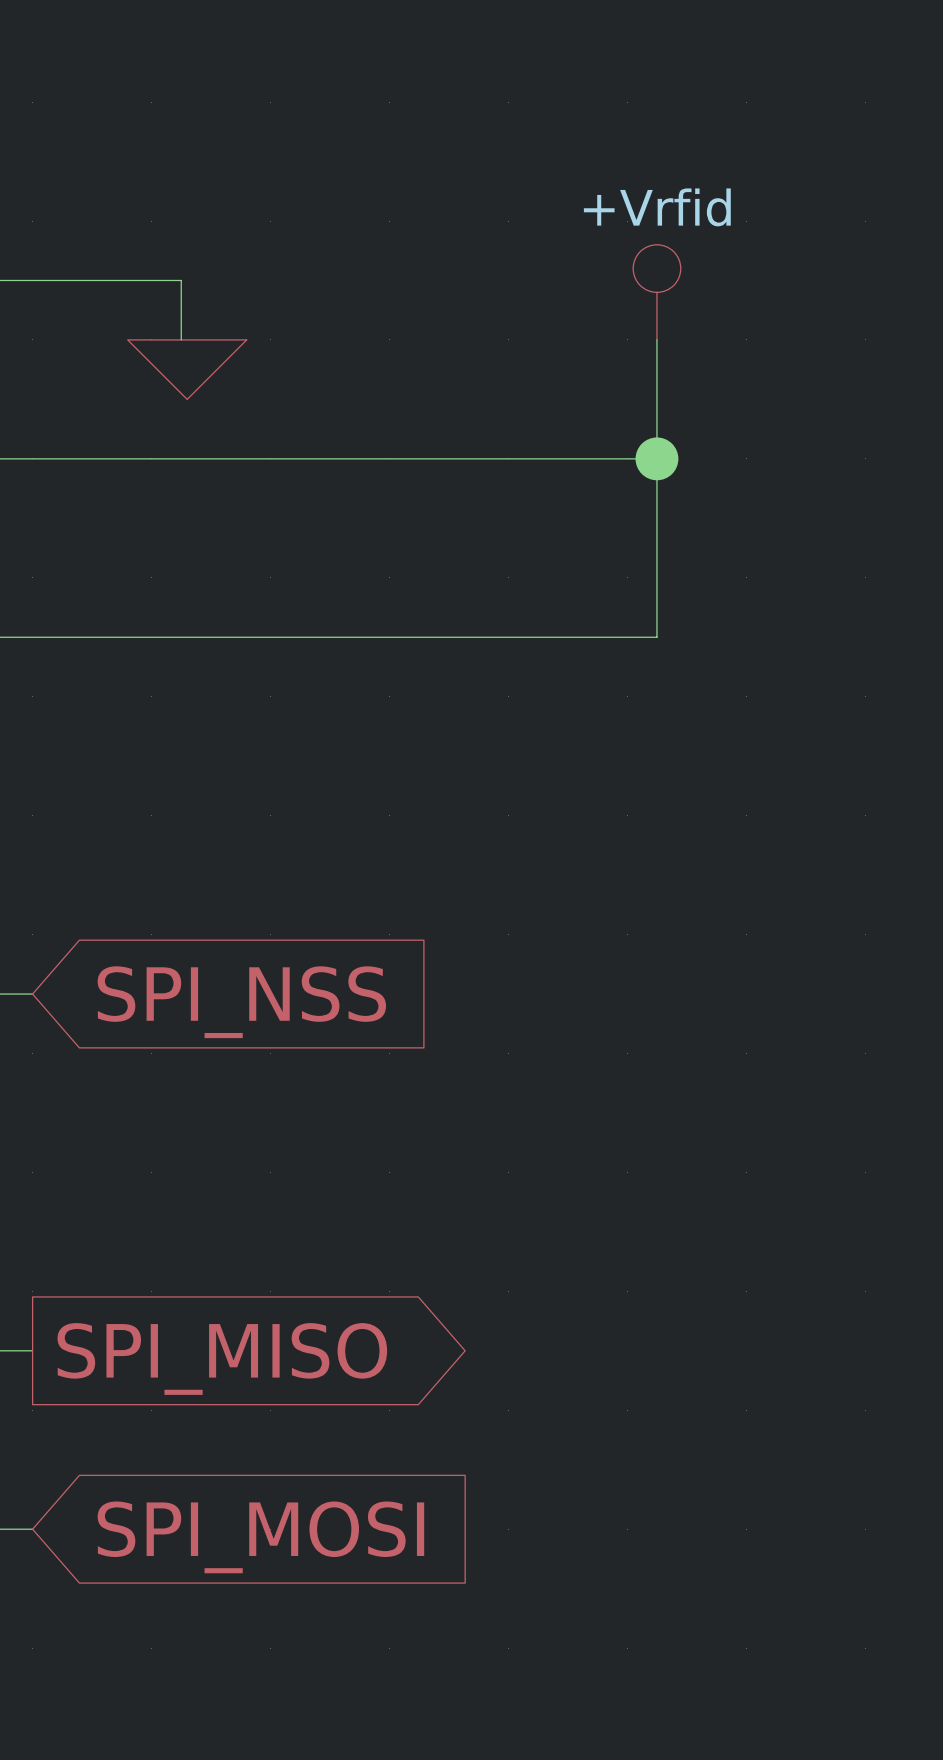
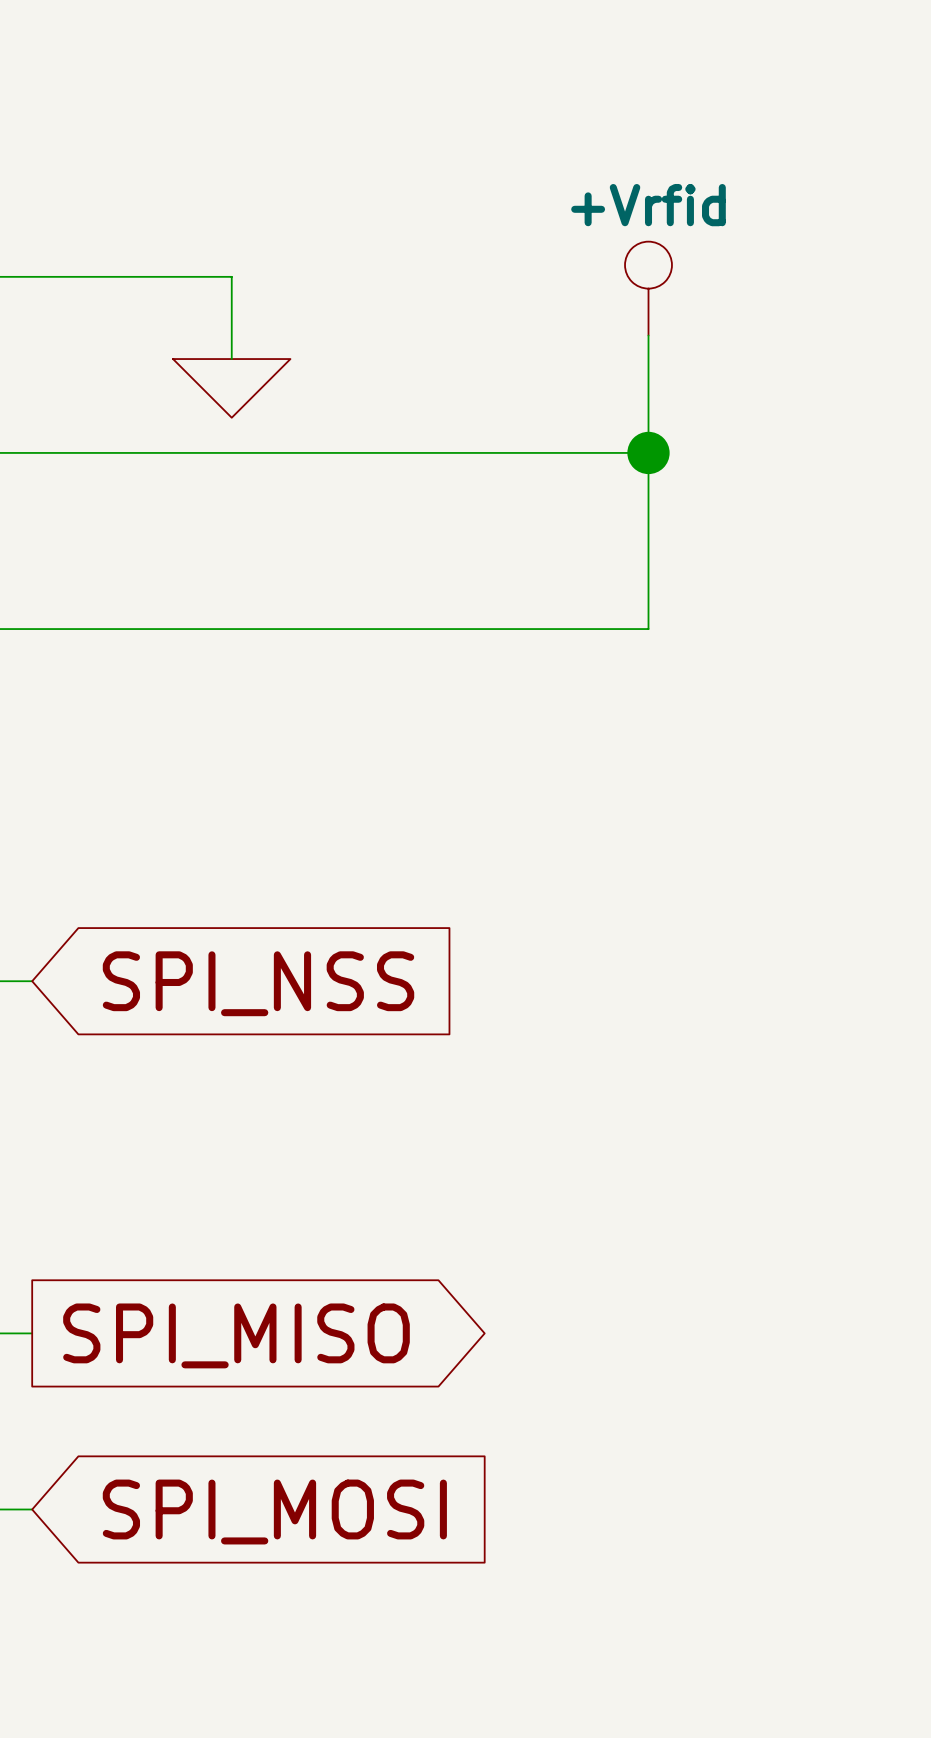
wire: (181, 280) (181, 339) -> (178, 276) (231, 276) (231, 359)
power symbol position: (187, 369) -> (231, 388)

